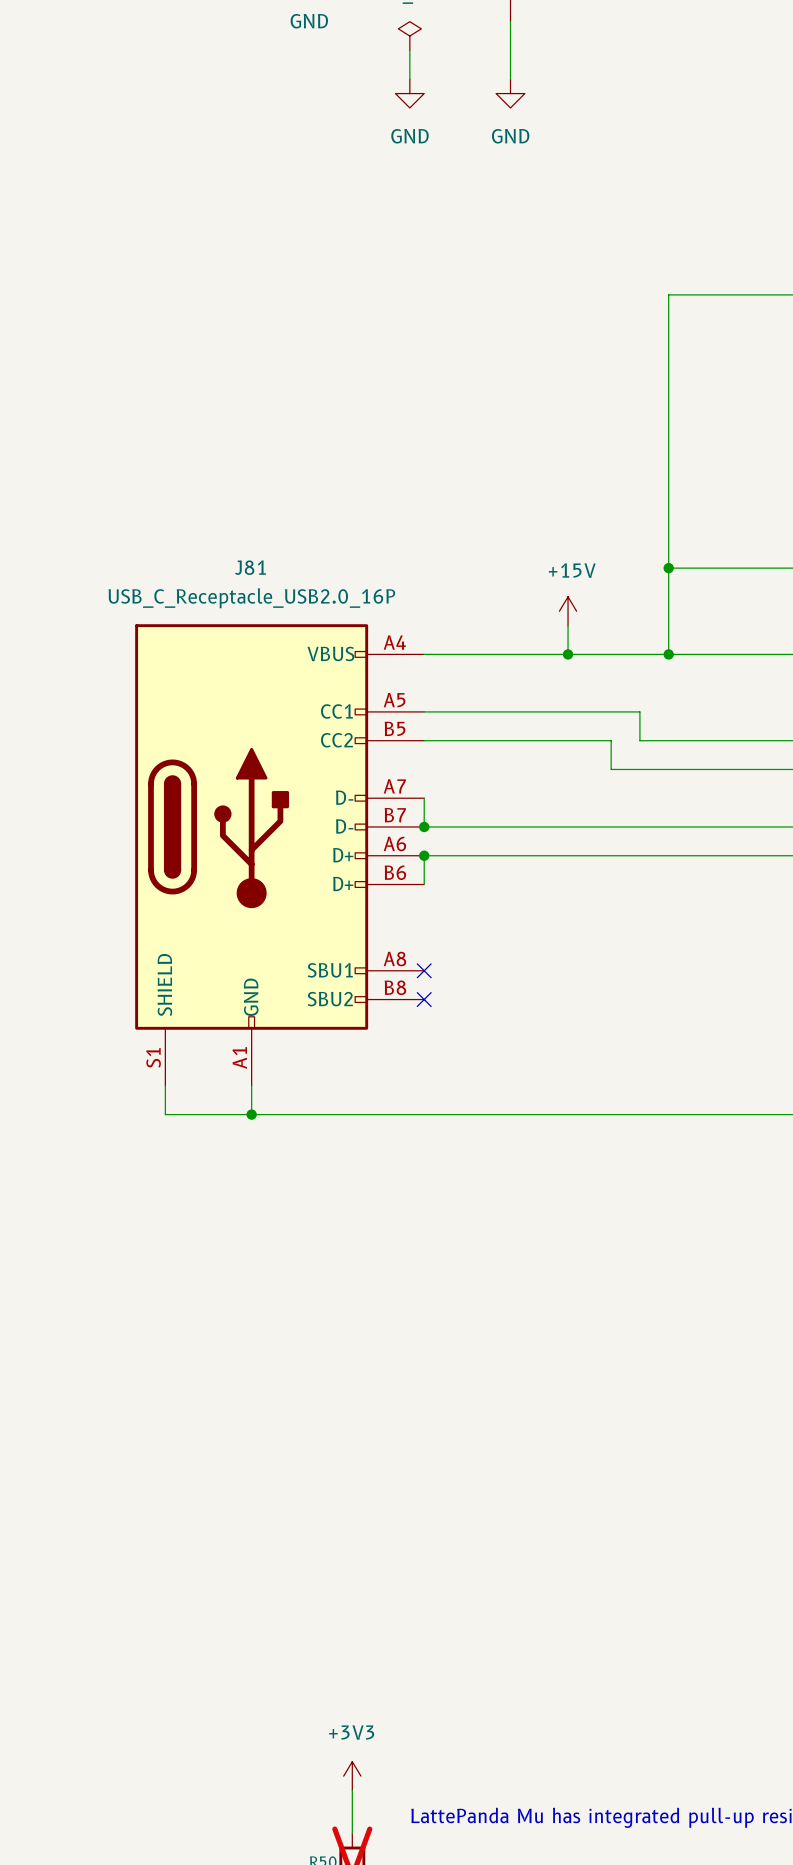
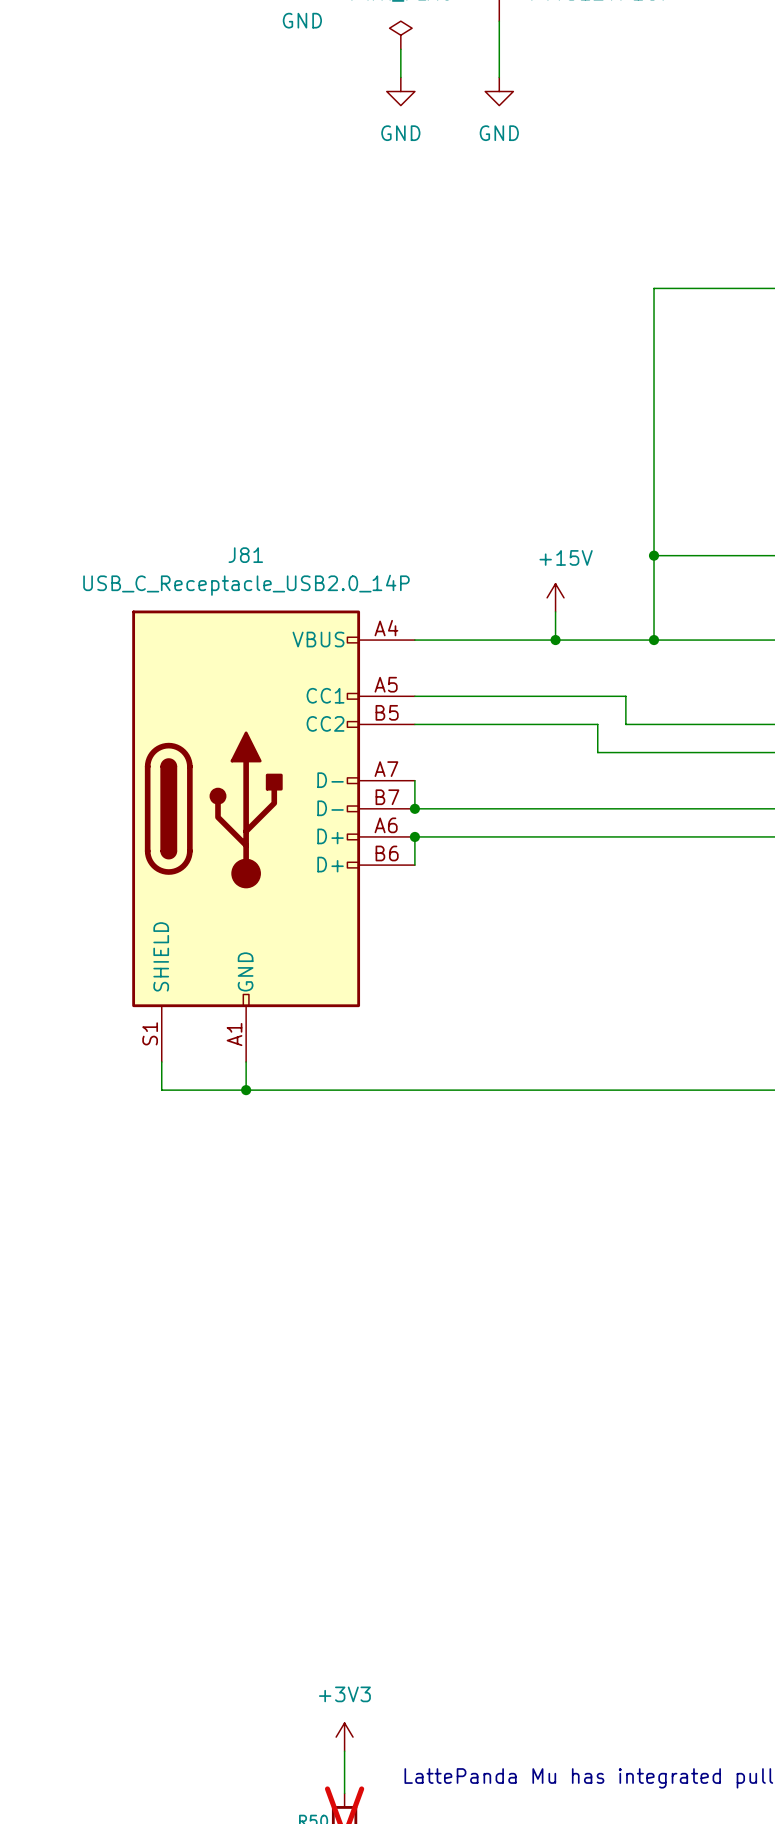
J81 value: USB_C_Receptacle_USB2.0_16P (251, 598) -> USB_C_Receptacle_USB2.0_14P (246, 585)
J81 symbol: [135, 624, 425, 1086] -> [132, 610, 415, 1062]
no-connect mark: (424, 970) -> none
no-connect mark: (424, 999) -> none

